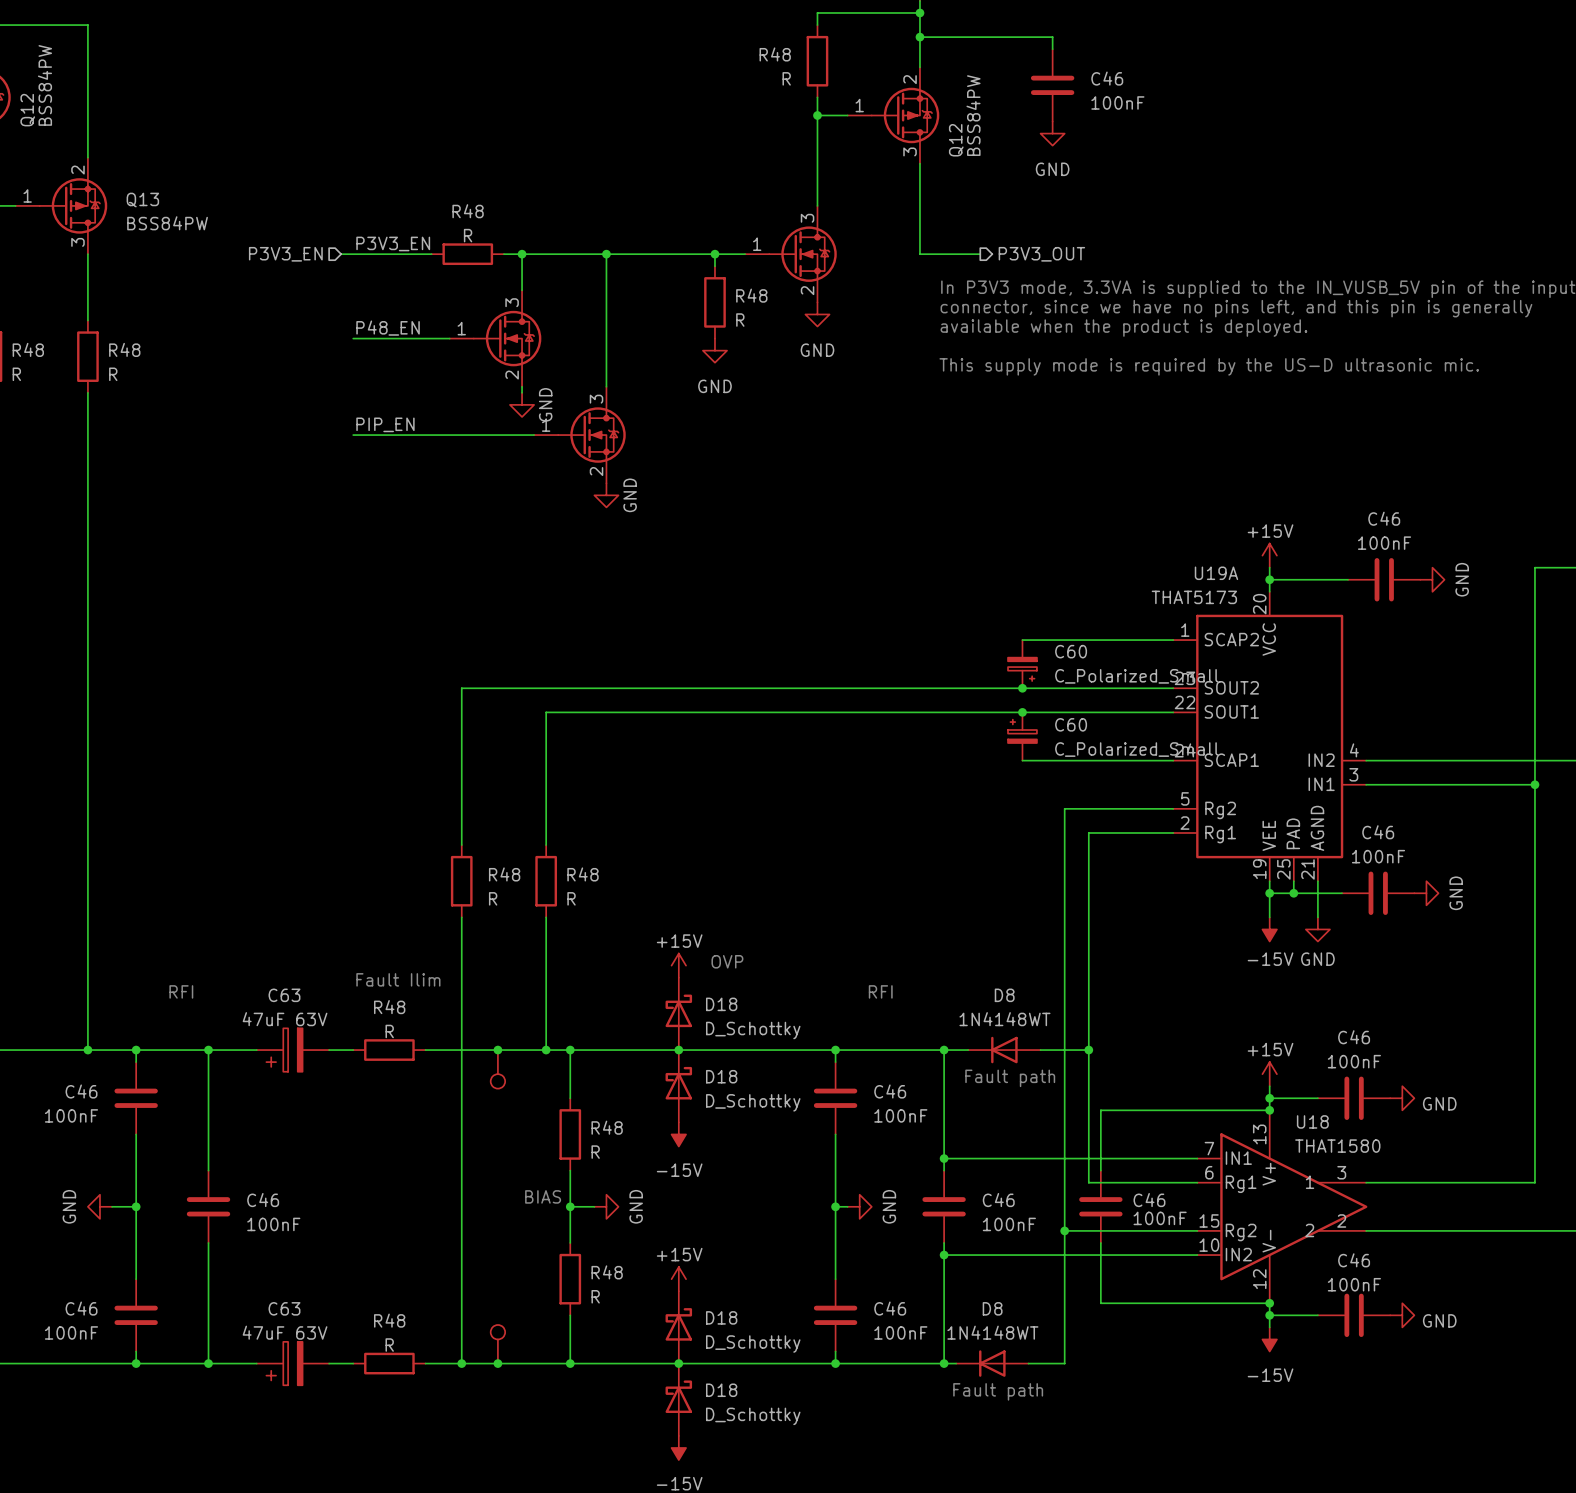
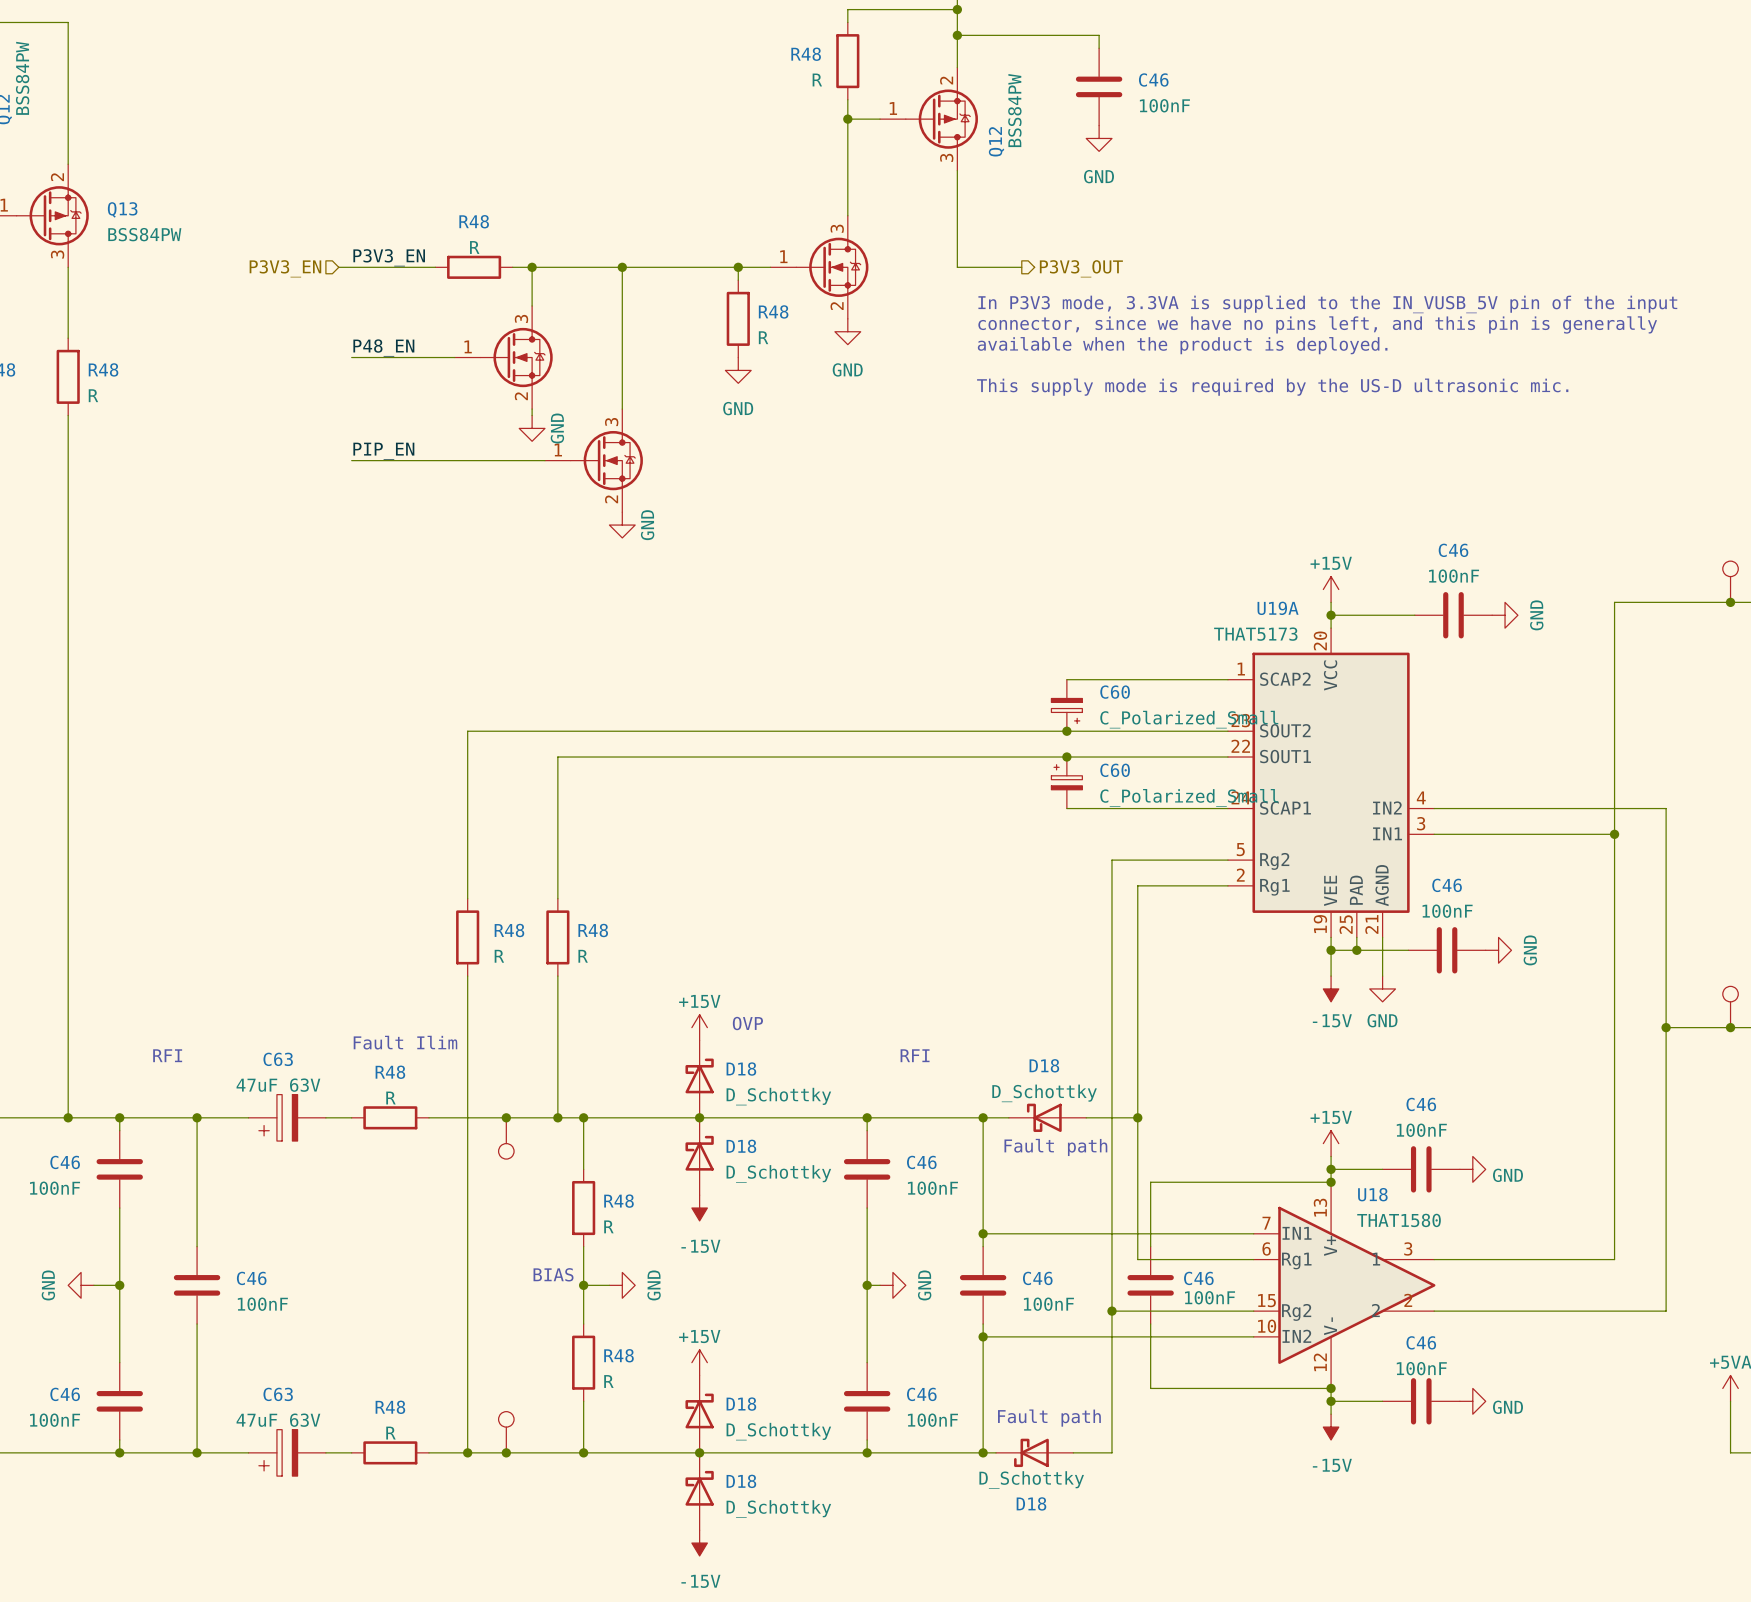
D8: 1N4148WT (1004, 1050) -> none
D18: none -> D_Schottky (1047, 1117)
D8: 1N4148WT (992, 1363) -> none
D18: none -> D_Schottky (1034, 1452)
text position: Fault path (998, 1391) -> Fault path (1049, 1418)

